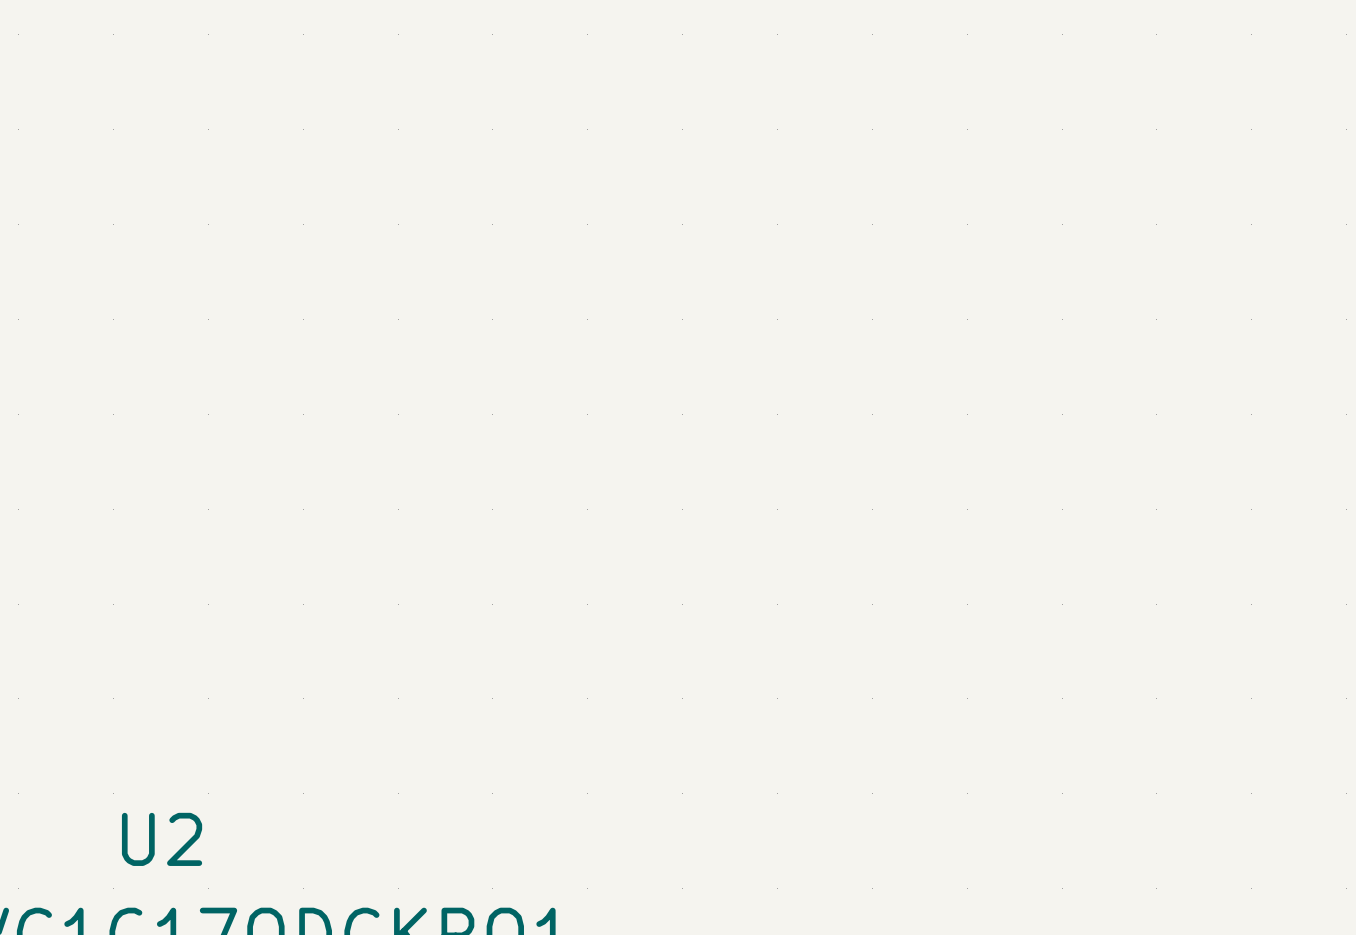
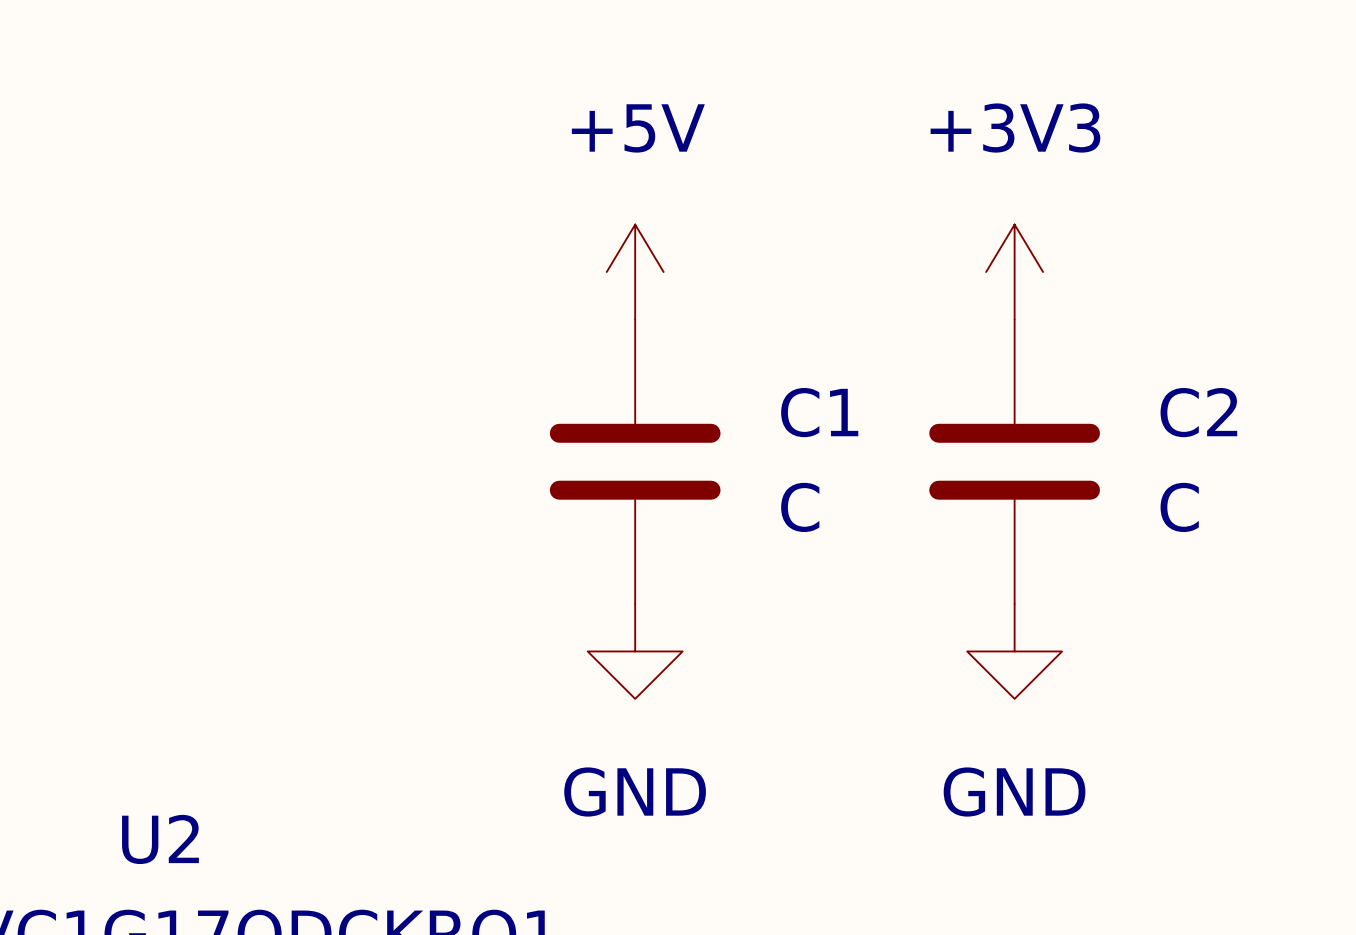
power symbol: none -> +5V (635, 272)
power symbol: none -> +3V3 (1014, 272)
C1: none -> C (635, 461)
C2: none -> C (1014, 461)
power symbol: none -> GND (635, 651)
power symbol: none -> GND (1014, 651)

